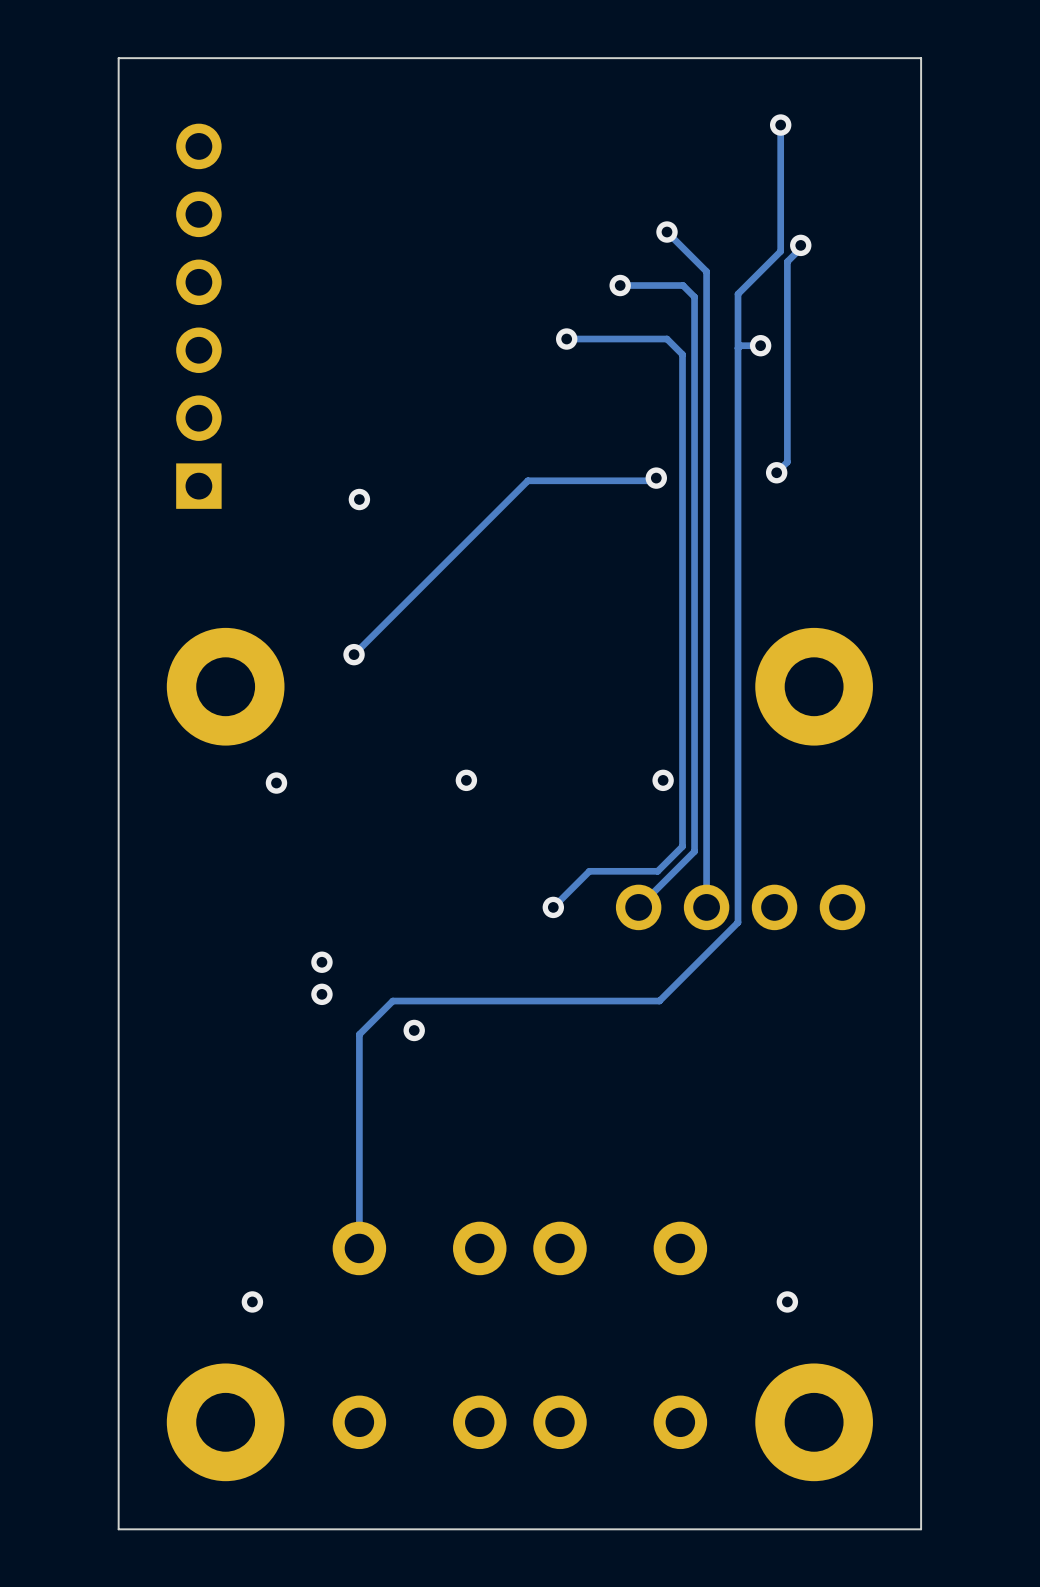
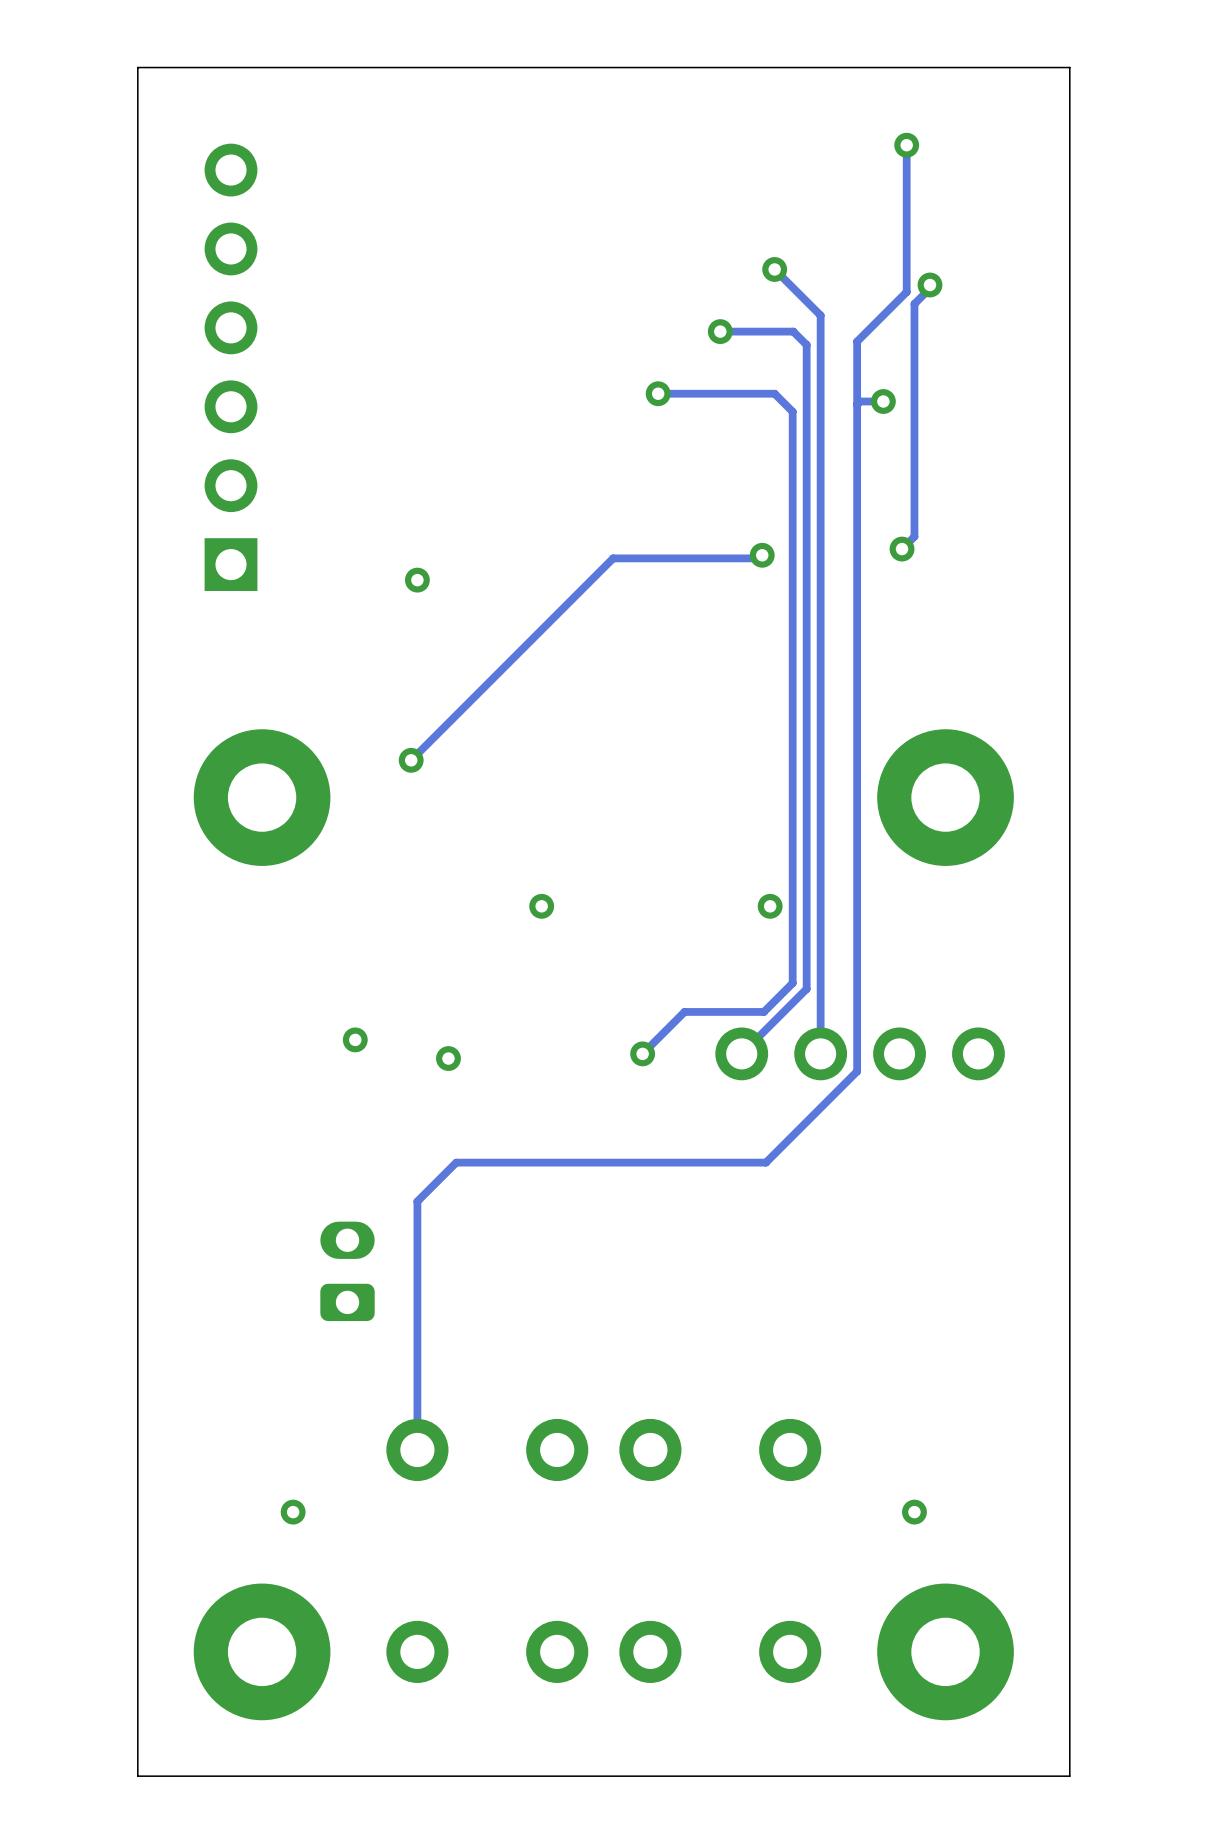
via: (276, 783) -> none
via: none -> (355, 1039)
via: none -> (448, 1058)
via: (321, 962) -> none
via: (321, 994) -> none
via: (414, 1030) -> none
part: none -> (347, 1271)

